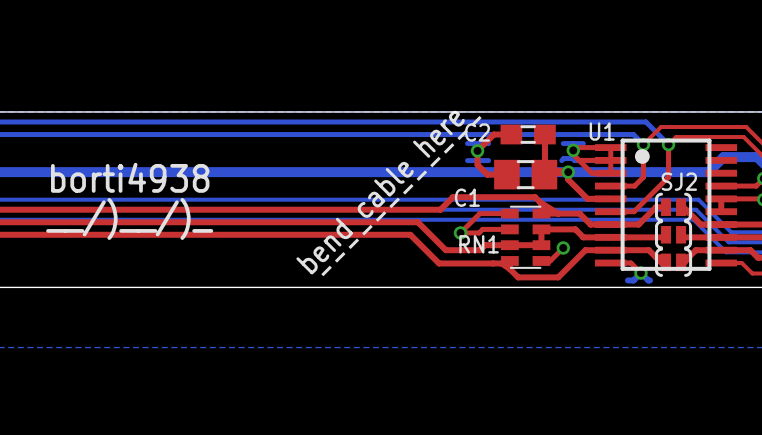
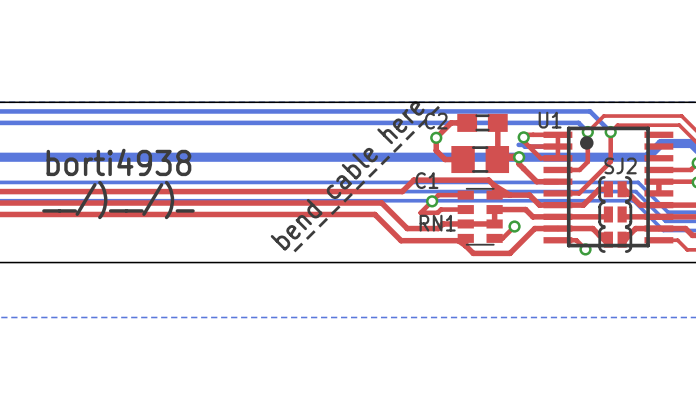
bottom track: (467, 143) (488, 143) -> none
bottom track: (563, 143) (583, 143) -> none
bottom track: (566, 158) (561, 160) -> none
bottom track: (467, 160) (488, 160) -> none
via position: (460, 232) -> (432, 201)
bottom track: (627, 280) (633, 280) (640, 273) (649, 280) -> none

